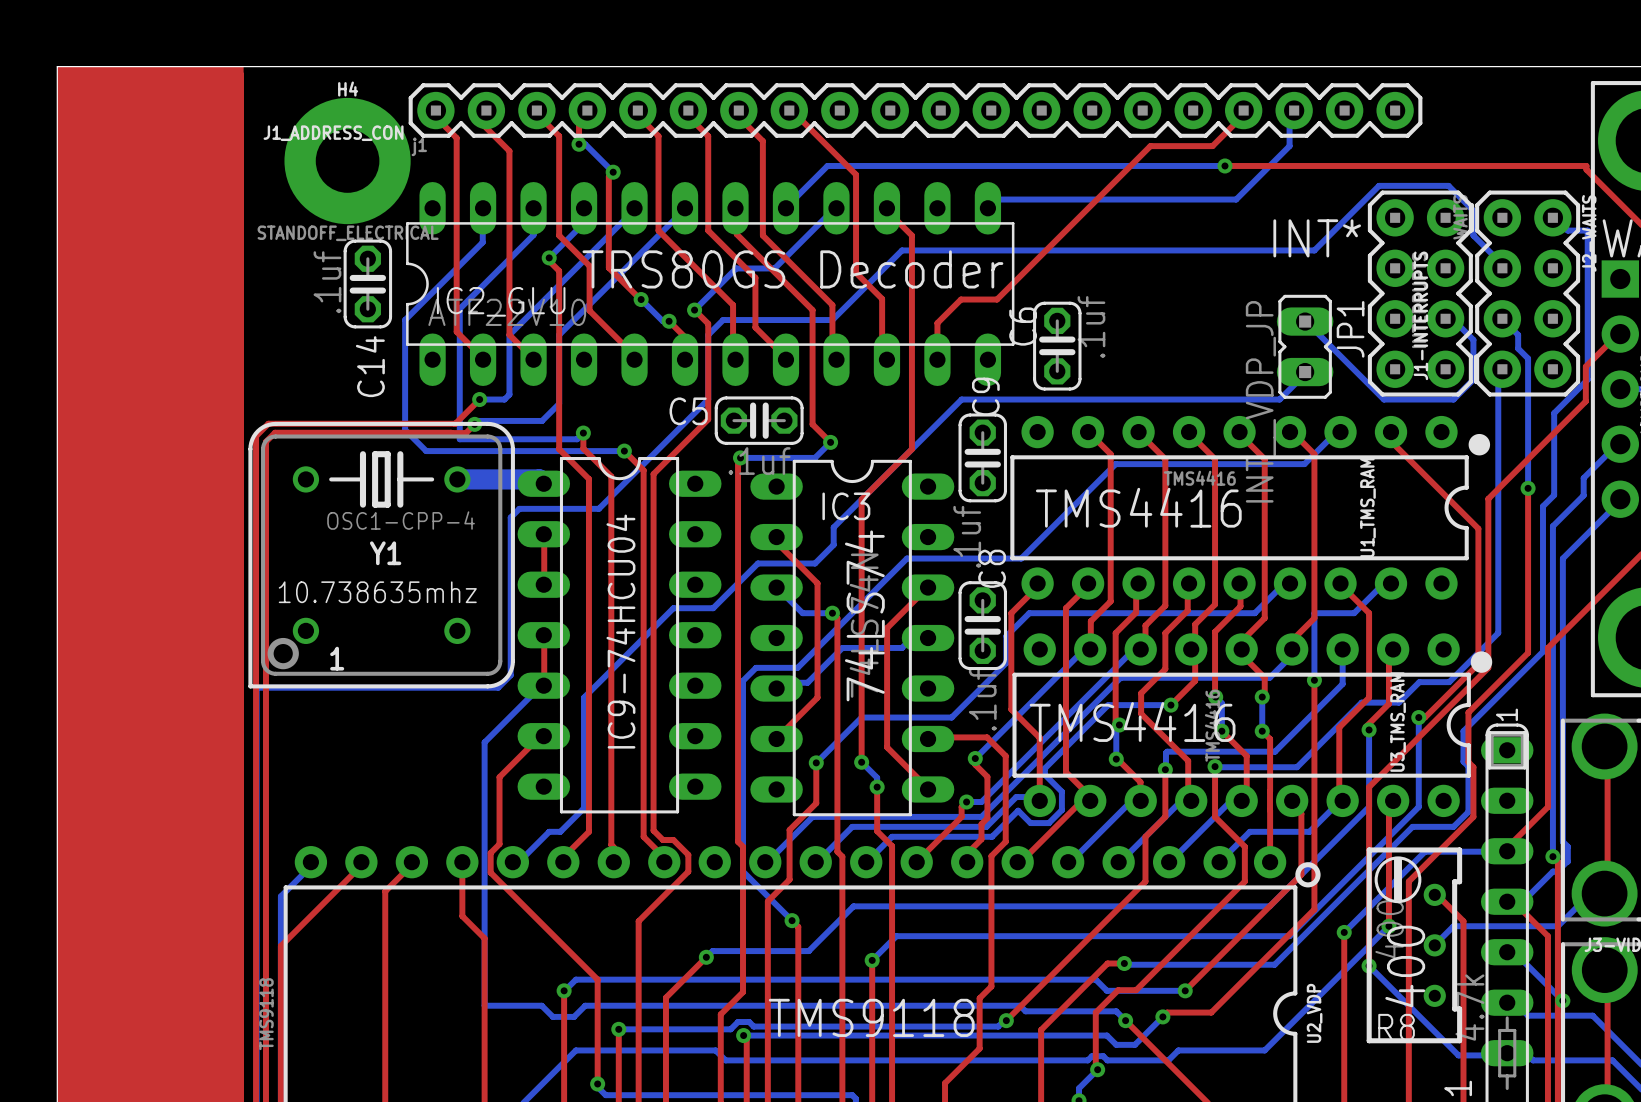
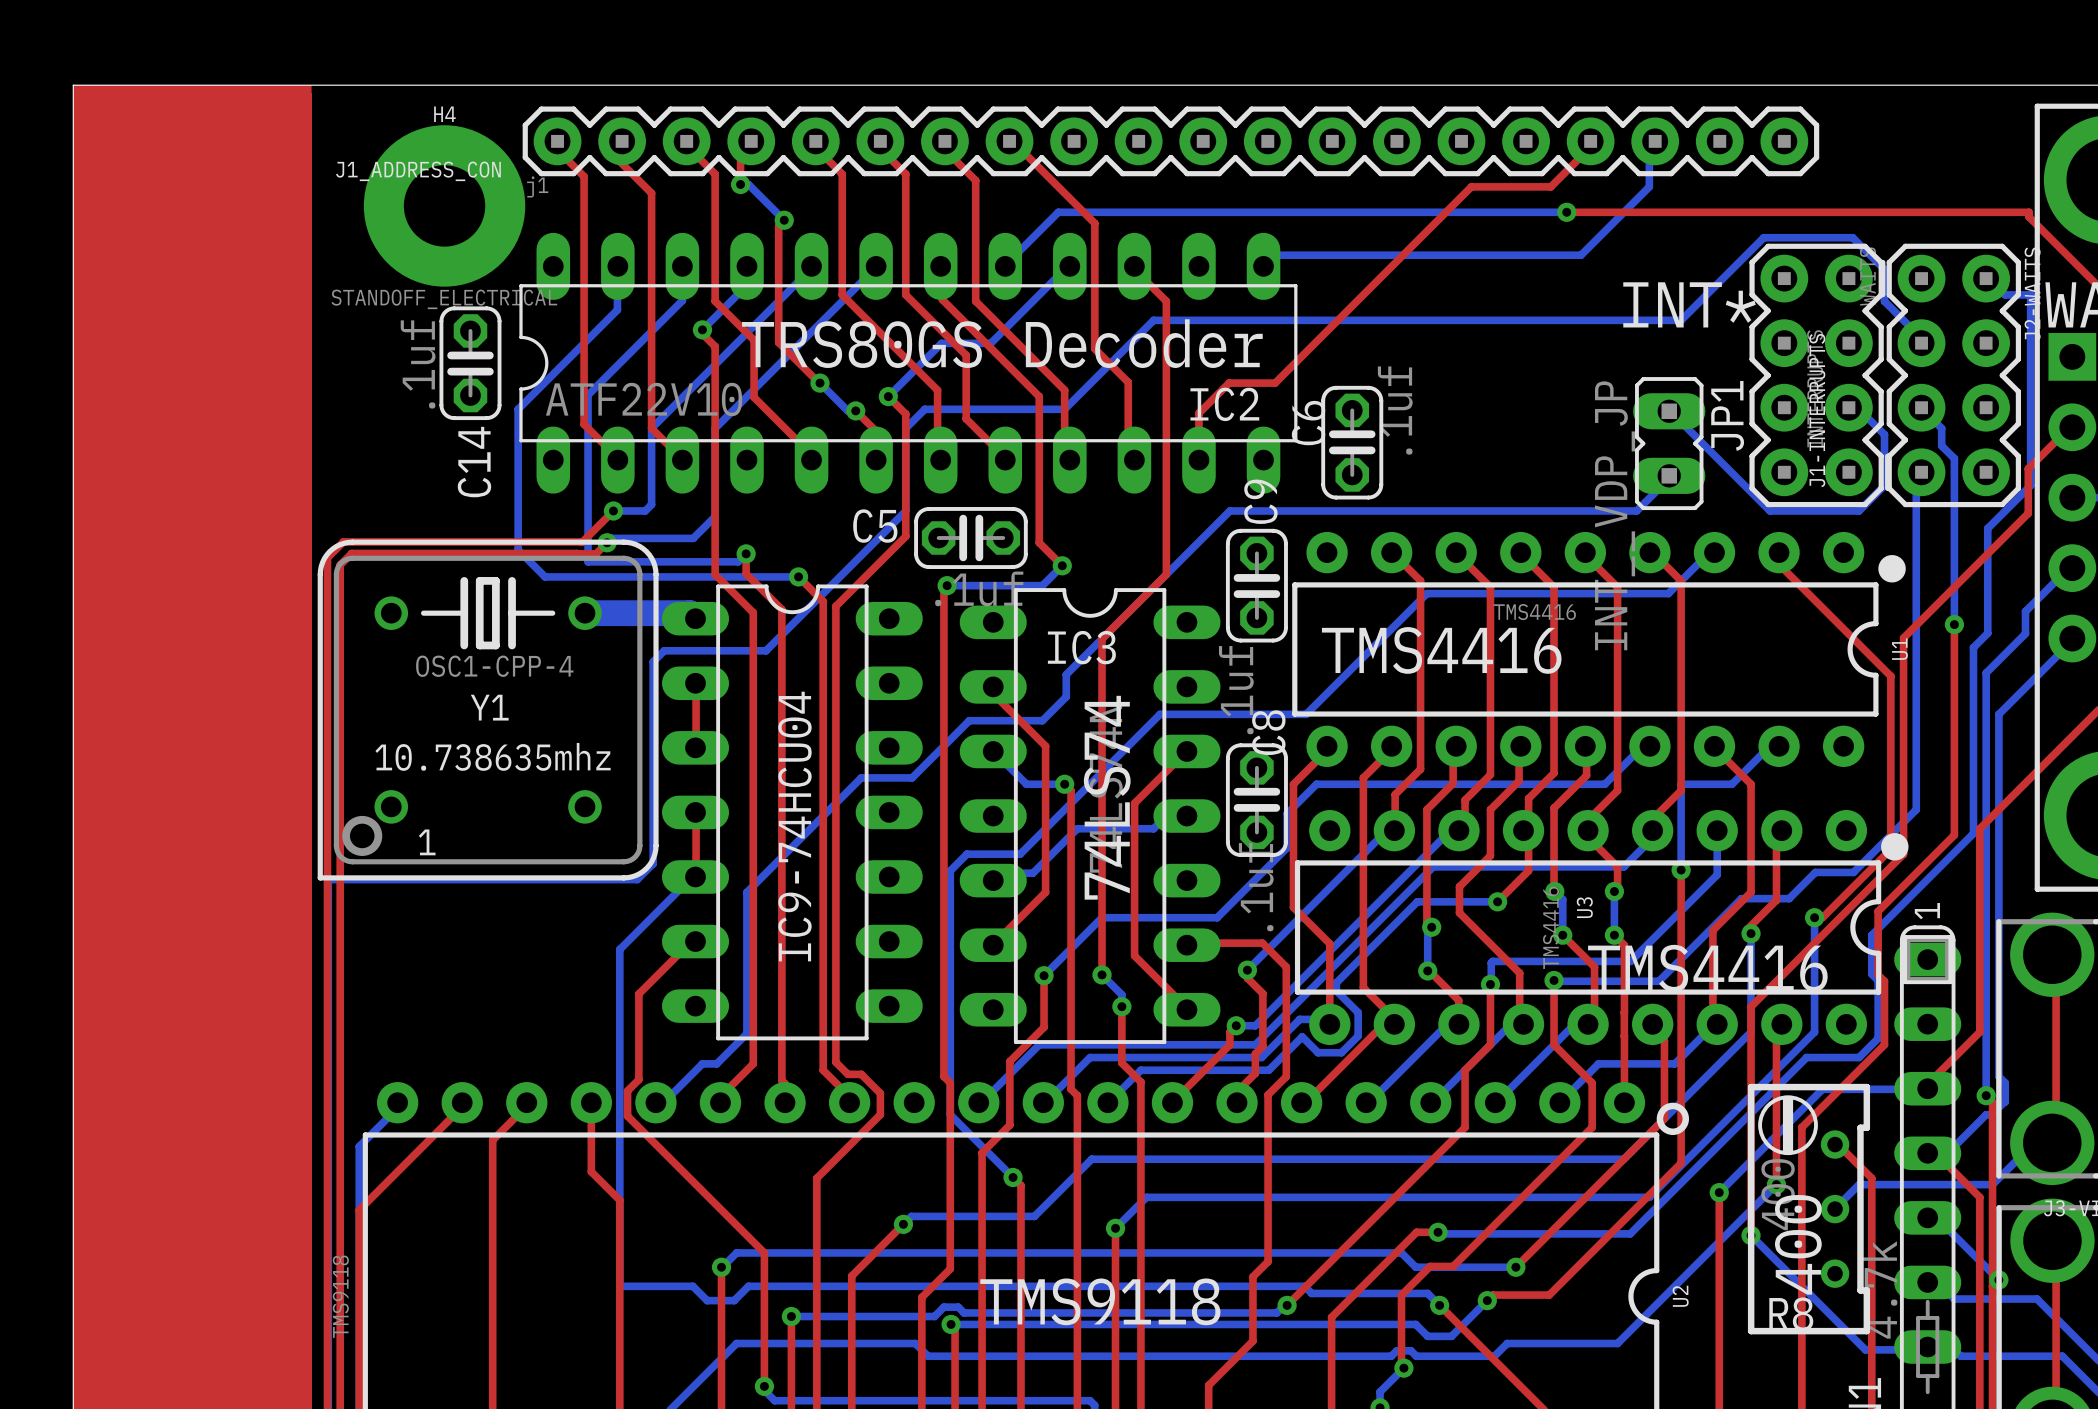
IC2_GLU name: IC2_GLU (501, 301) -> IC2 (1224, 404)
U1_TMS_RAM name: U1_TMS_RAM (1367, 507) -> U1 (1899, 649)
text position: TMS4416 (1132, 722) -> TMS4416 (1707, 968)
U3_TMS_RAM name: U3_TMS_RAM (1398, 722) -> U3 (1584, 907)
U2_VDP name: U2_VDP (1314, 1013) -> U2 (1680, 1296)

